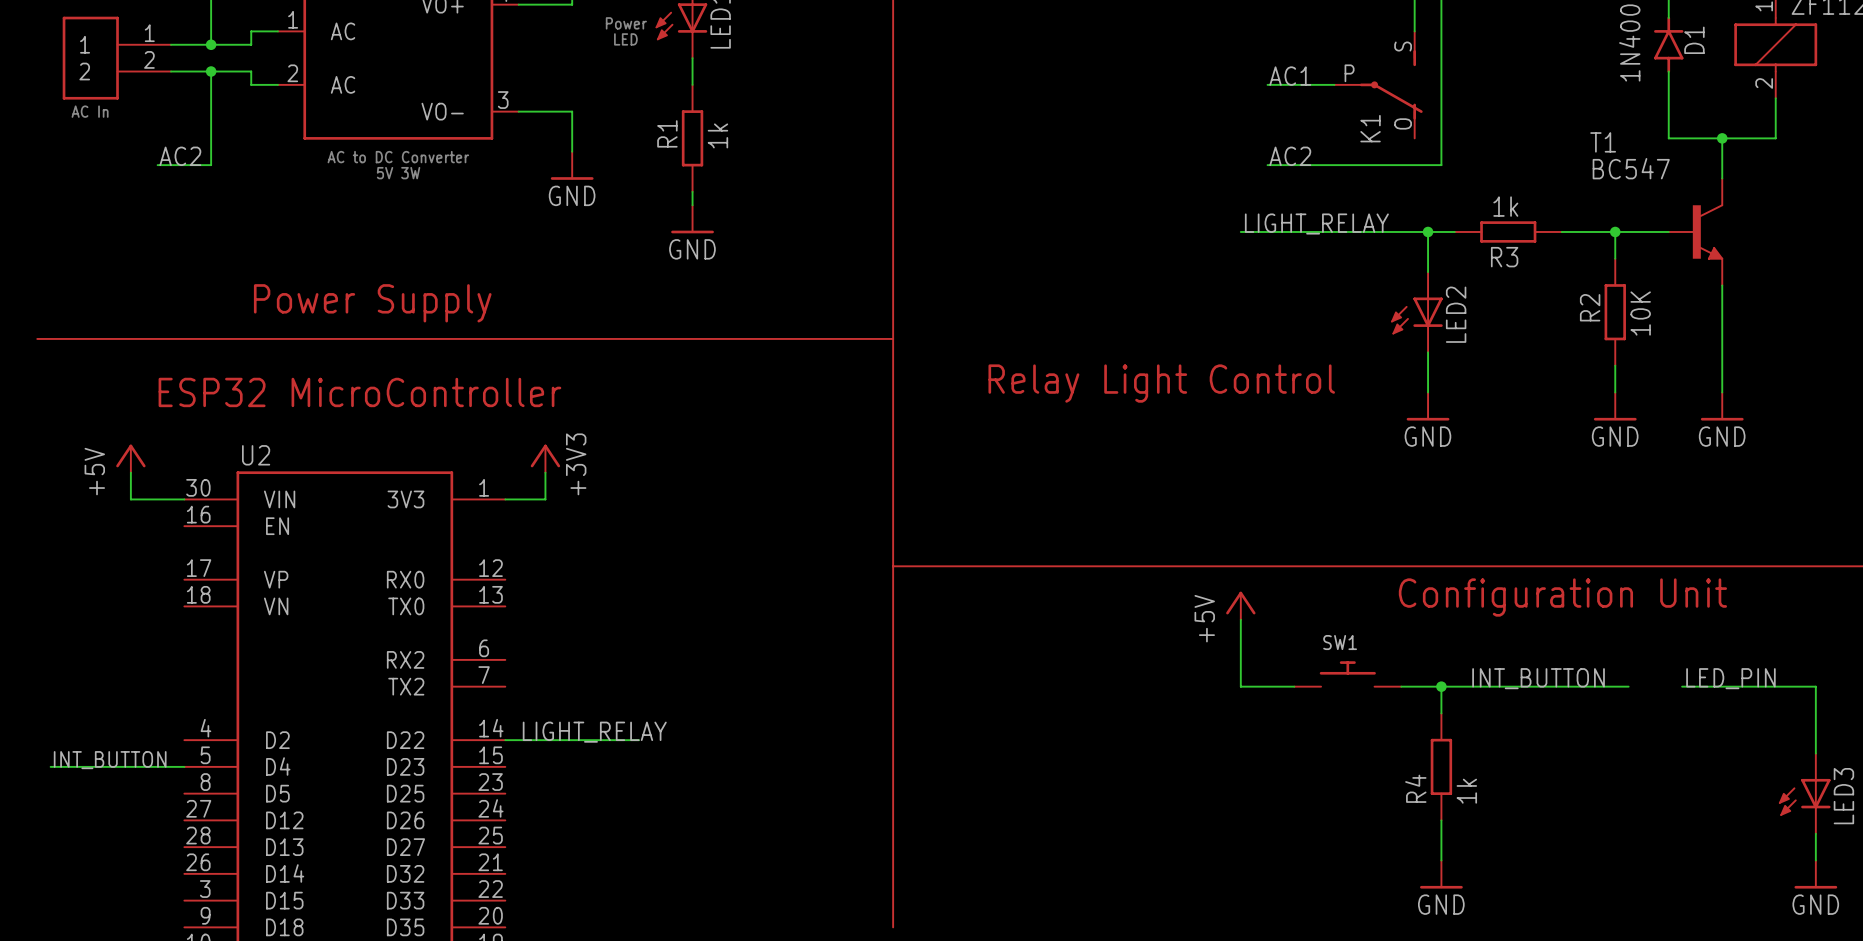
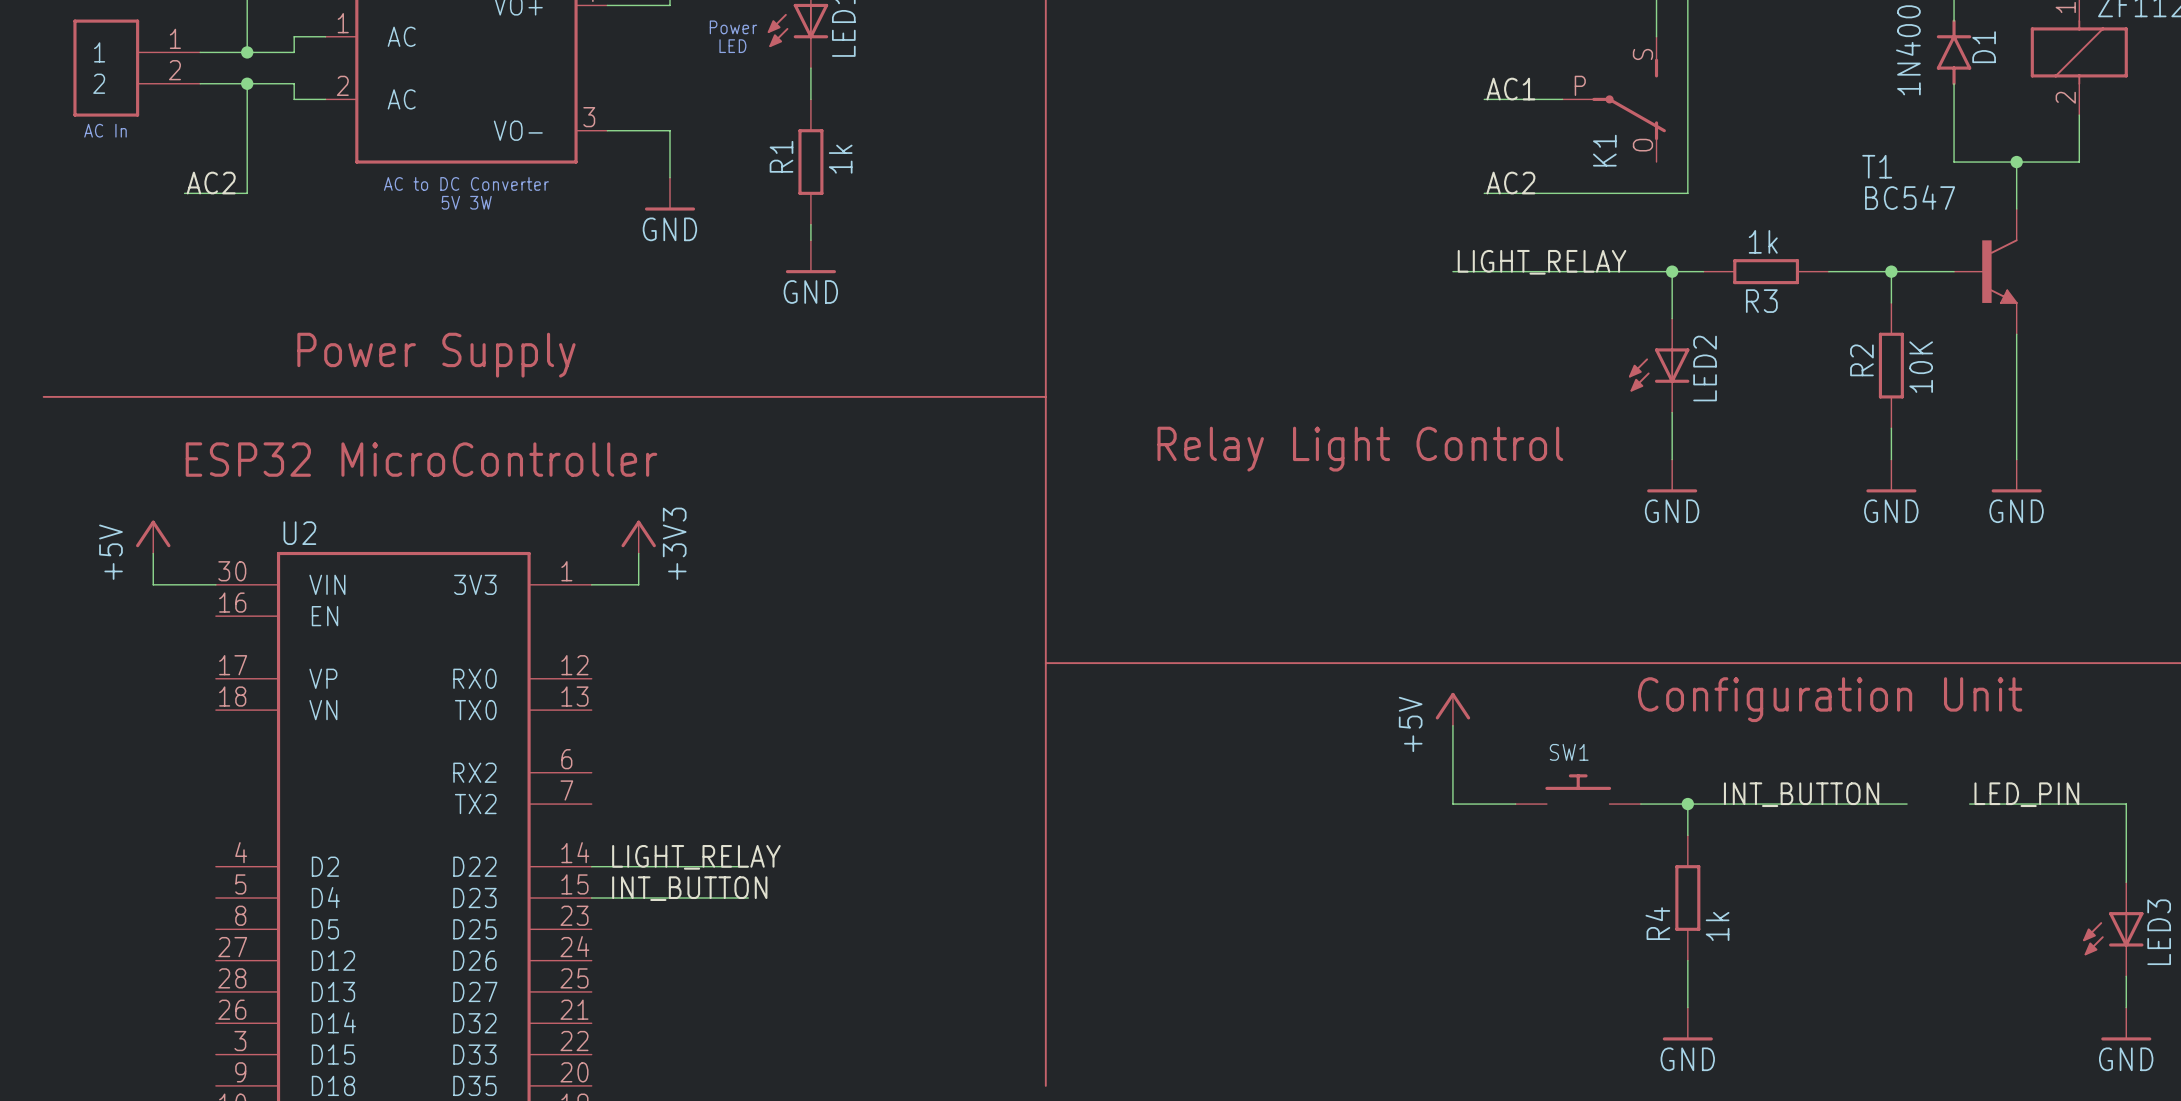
label: none -> INT_BUTTON (689, 888)
label: INT_BUTTON (110, 760) -> none
wire: (50, 766) (184, 766) -> none
wire: none -> (591, 898) (748, 898)

